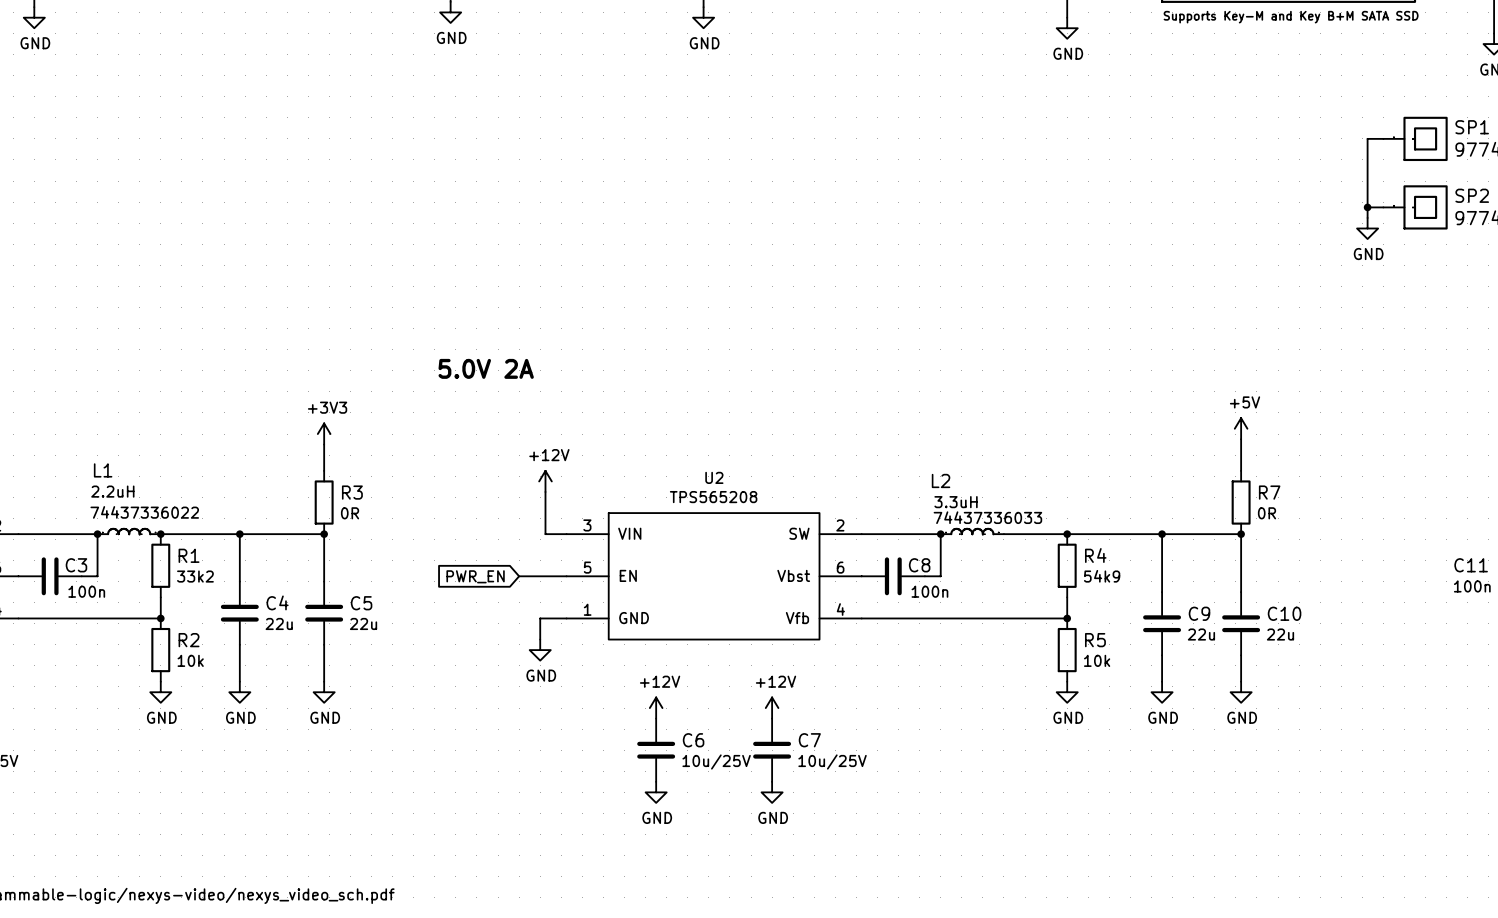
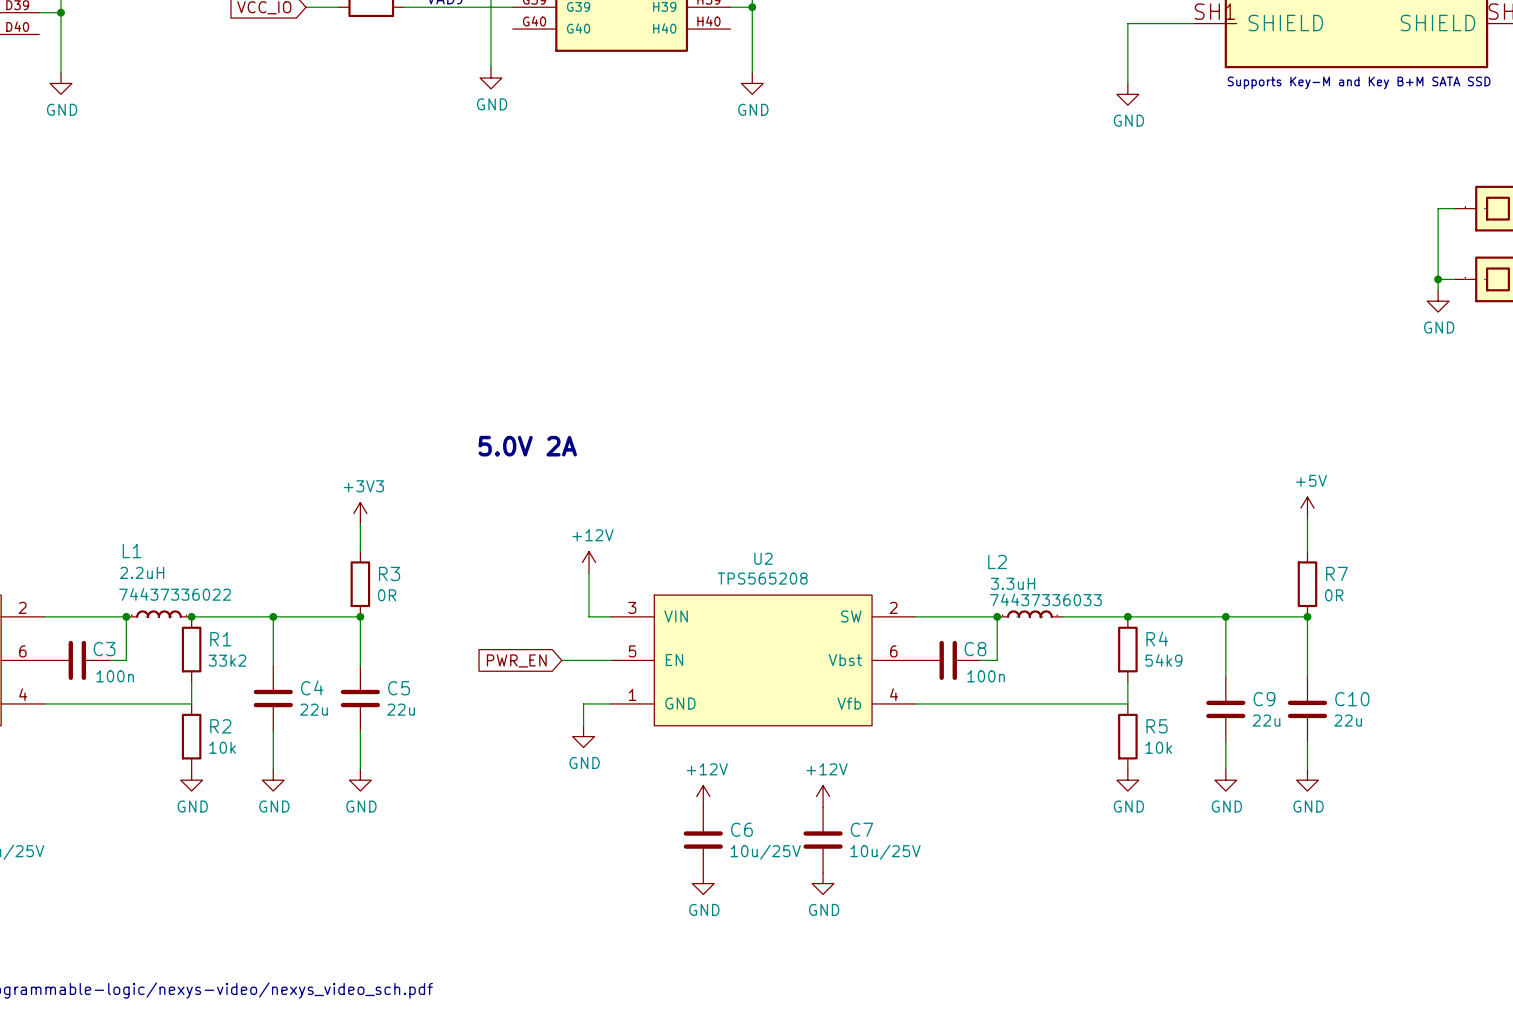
junction: (160, 618) -> none
junction: (1067, 618) -> none

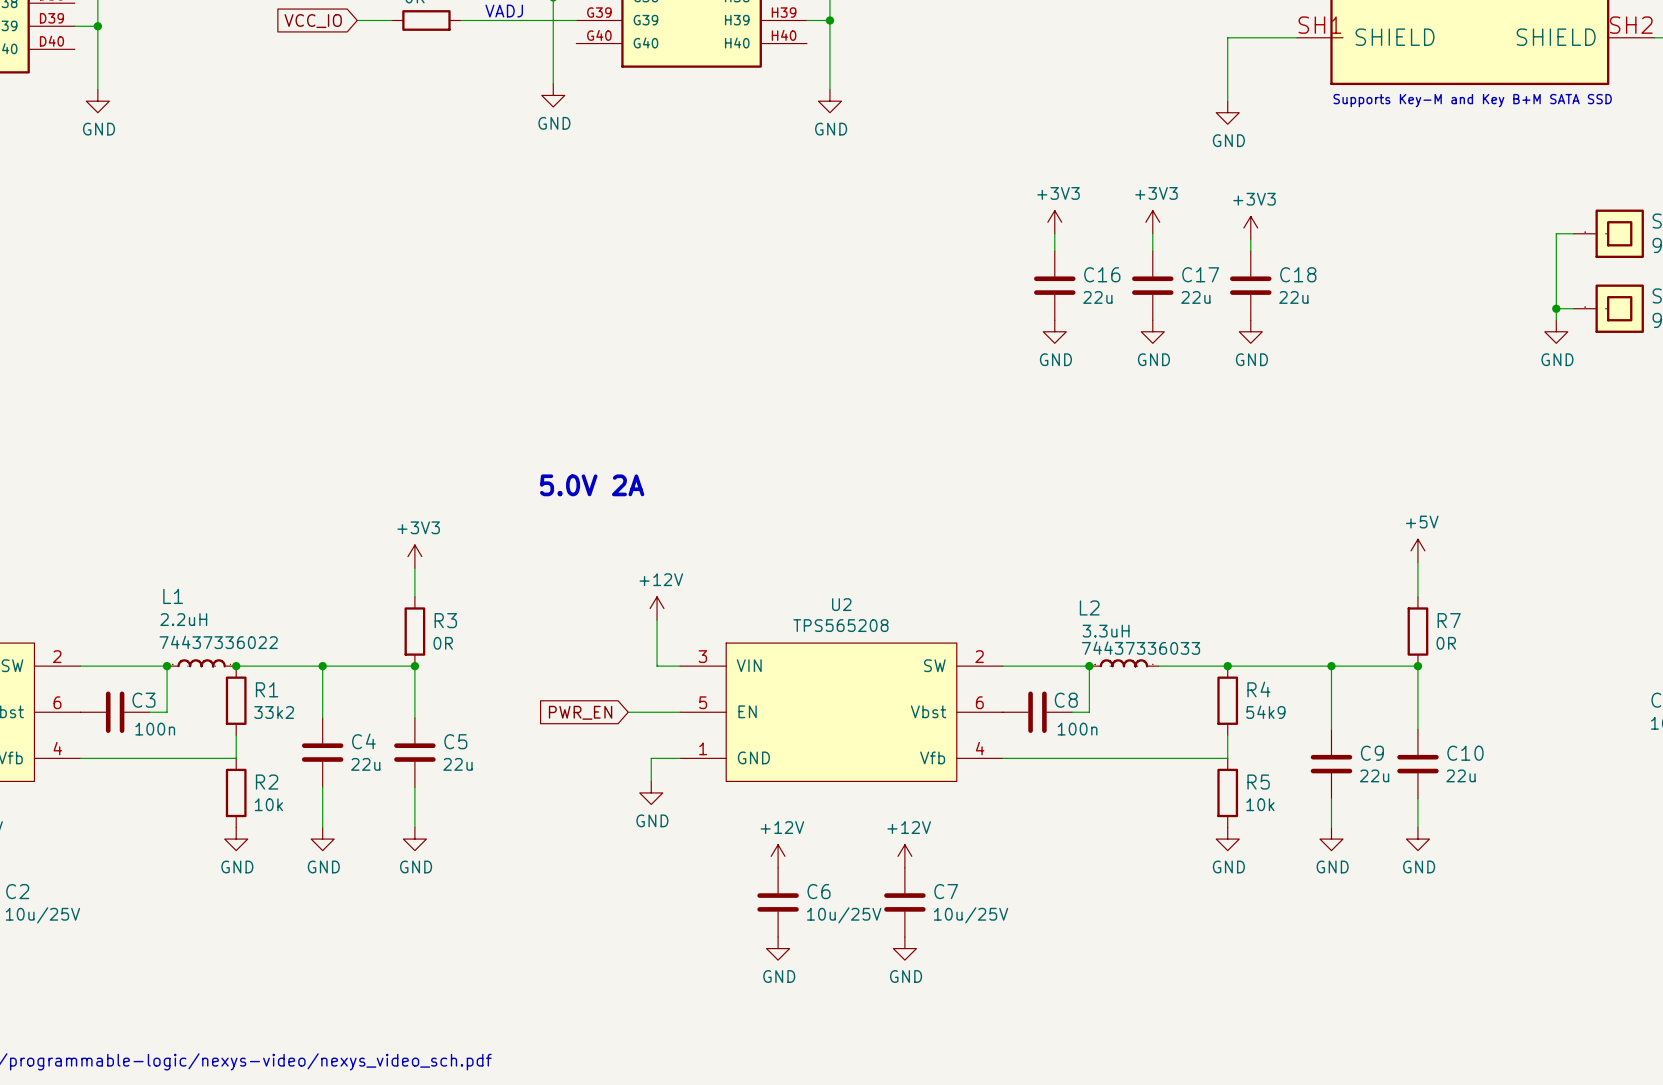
power symbol: none -> +3V3 (1054, 222)
power symbol: none -> +3V3 (1152, 222)
power symbol: none -> +3V3 (1250, 228)
wire: none -> (1054, 233) (1054, 251)
wire: none -> (1152, 233) (1152, 251)
wire: none -> (1250, 239) (1250, 251)
C16: none -> (1054, 285)
C17: none -> (1152, 285)
C18: none -> (1250, 285)
power symbol: none -> GND (1054, 331)
power symbol: none -> GND (1152, 331)
power symbol: none -> GND (1250, 331)

